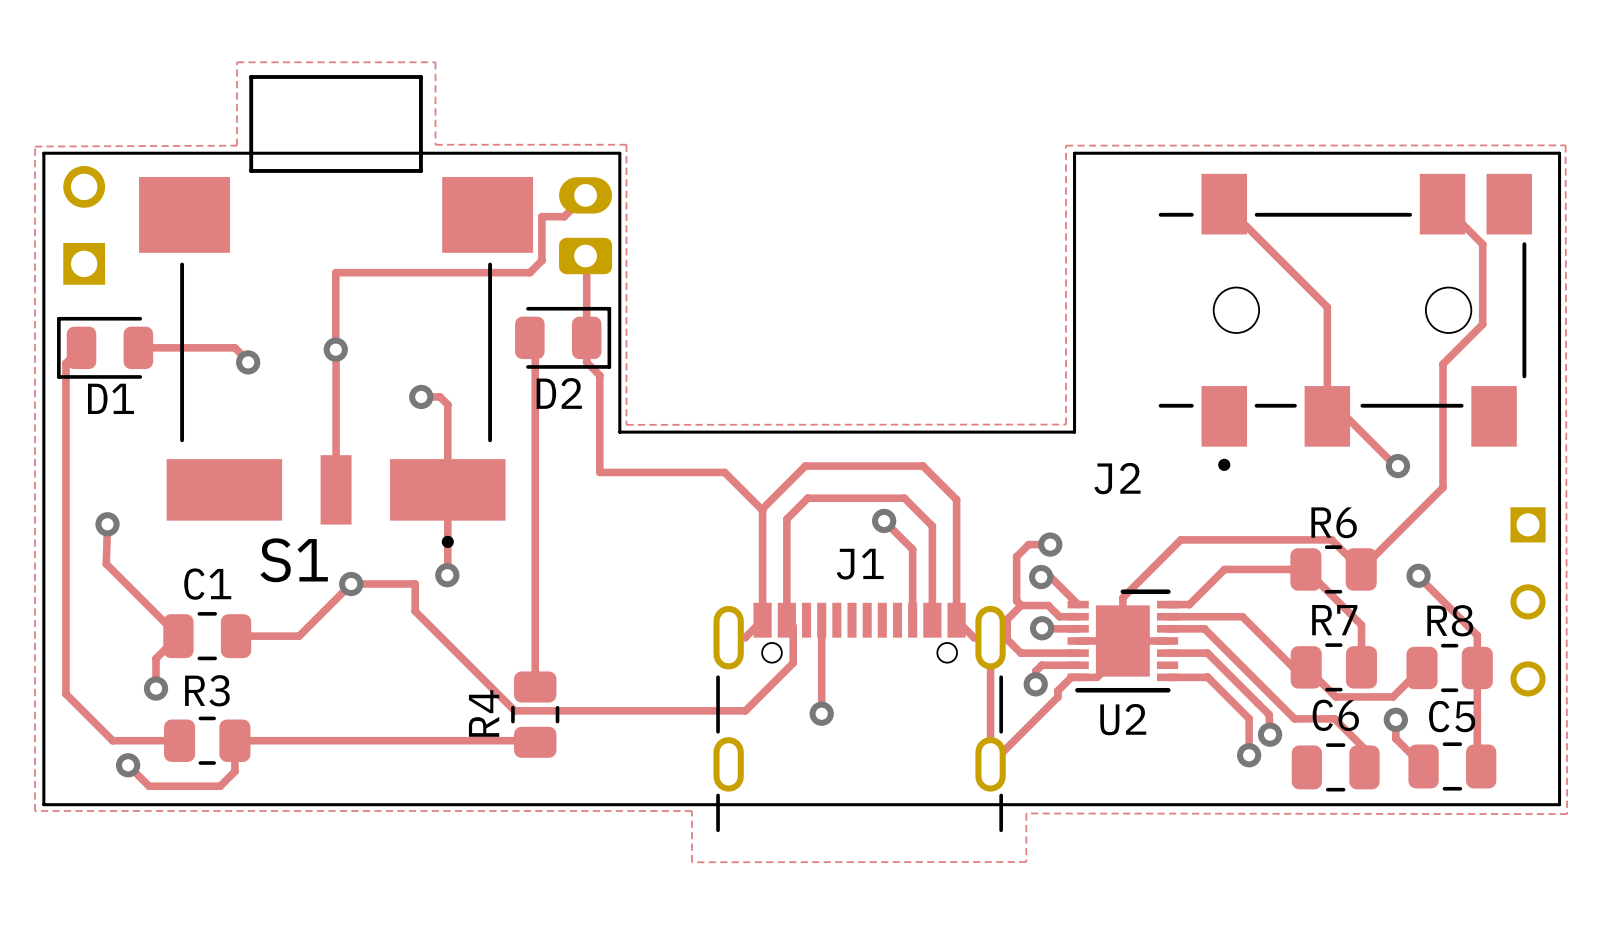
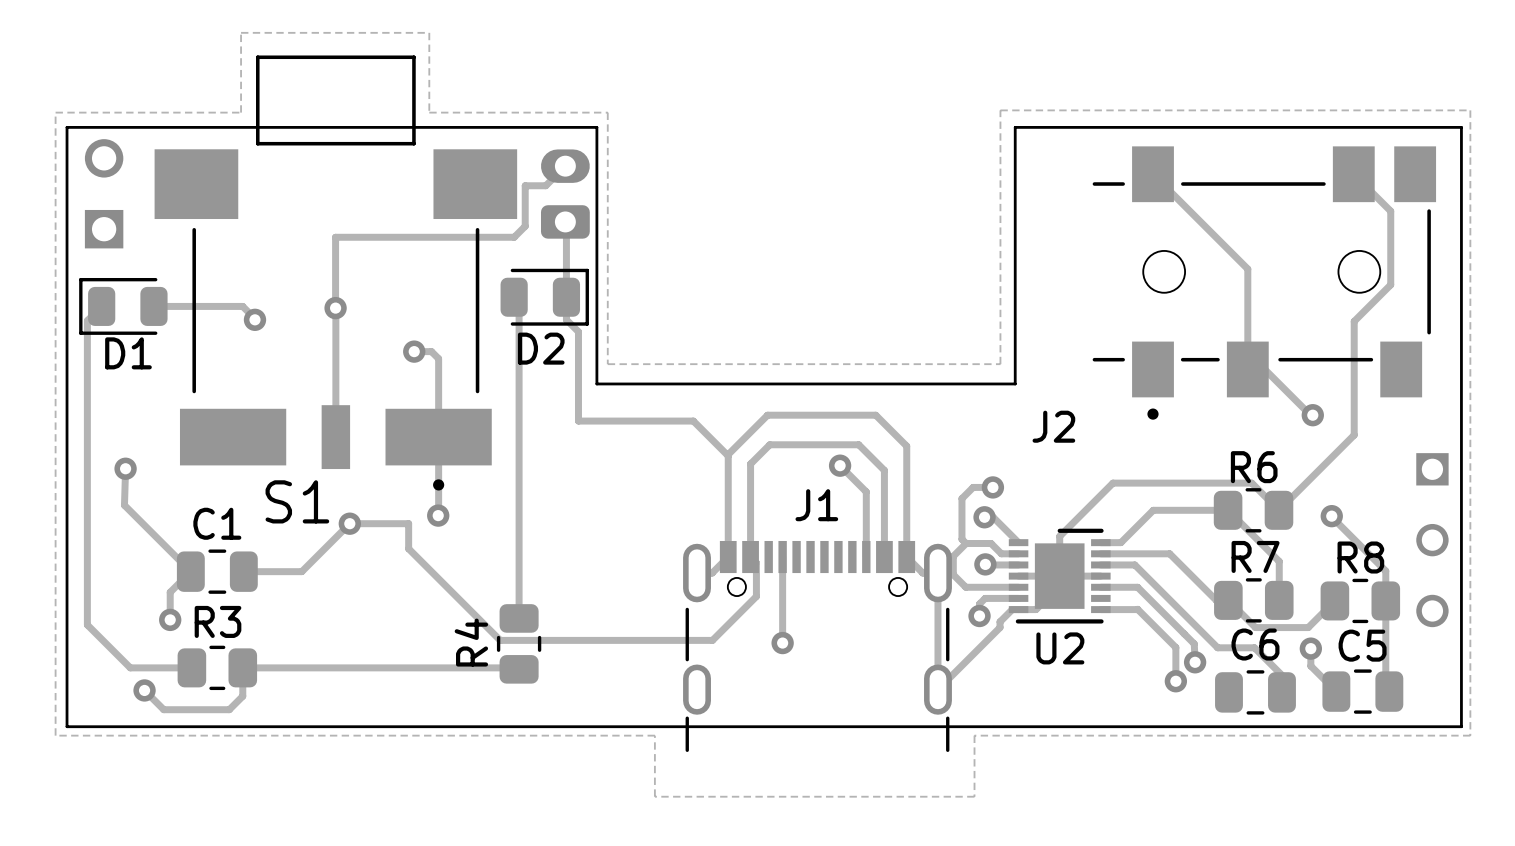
zone outline: (236, 62) (236, 145) (35, 146) (35, 811) (691, 811) (691, 862) (1026, 861) (1026, 813) (1567, 814) (1565, 145) (1066, 145) (1066, 424) (626, 424) (626, 144) (435, 144) (435, 62) (236, 62) -> (241, 32) (241, 112) (55, 112) (55, 735) (654, 735) (654, 796) (974, 796) (974, 735) (1470, 735) (1470, 110) (1000, 110) (1000, 364) (607, 364) (607, 112) (429, 112) (429, 32) (241, 32)

